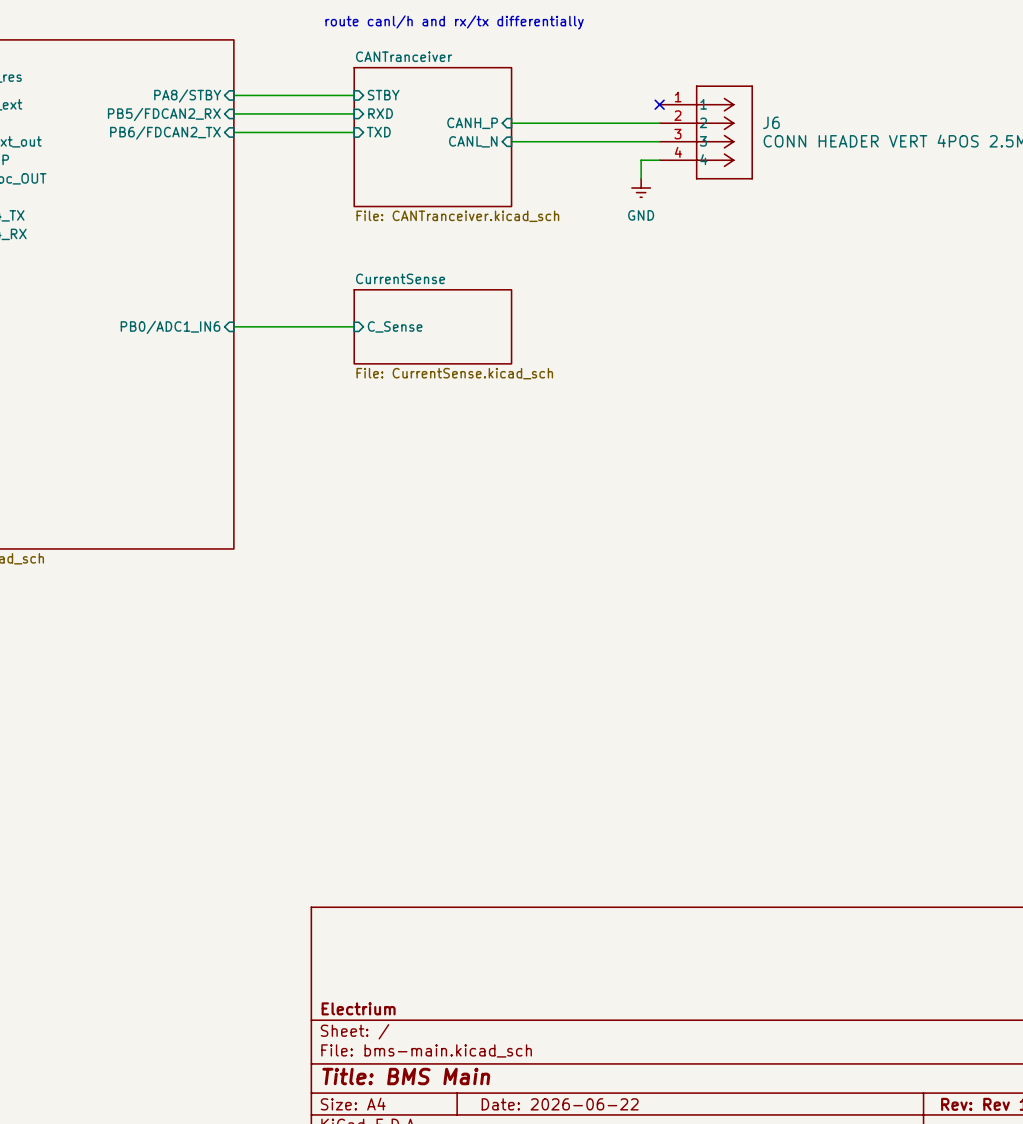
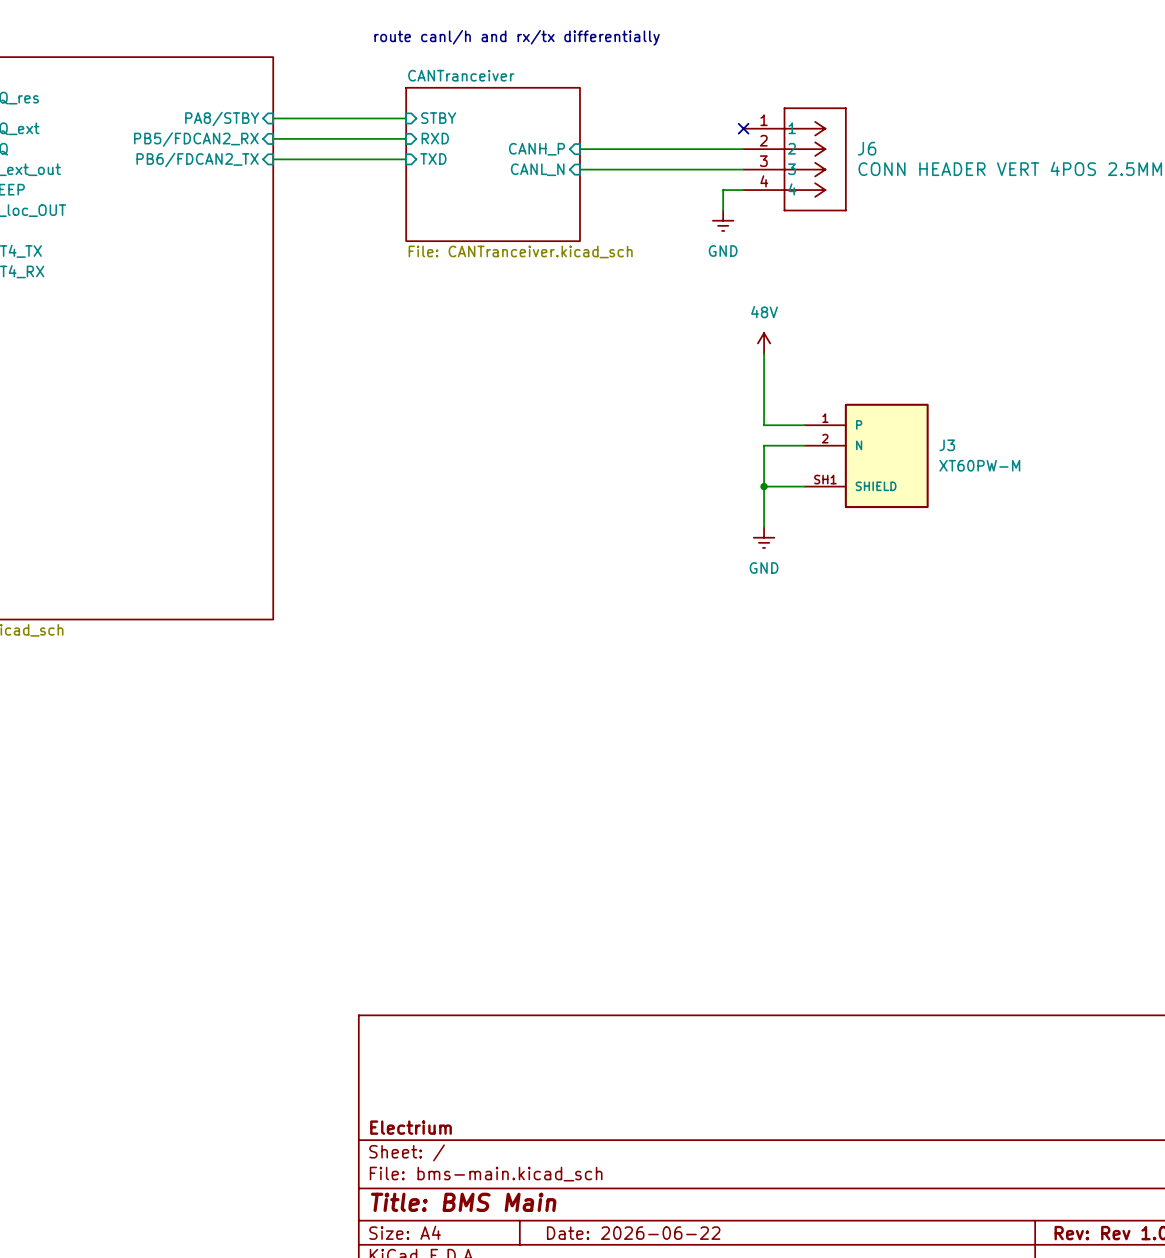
power symbol: none -> 48V (764, 343)
wire: none -> (764, 353) (764, 425) (804, 425)
wire: (233, 326) (354, 326) -> none
sheet pin: C_Sense (395, 326) -> none
sheet CurrentSense: File: CurrentSense.kicad_sch (432, 326) -> none
sheet pin: PB0/ADC1_IN6 (170, 327) -> none
wire: none -> (804, 445) (764, 445) (764, 527)
J3: none -> XT60PW-M (866, 455)
wire: none -> (764, 486) (804, 486)
junction: none -> (764, 486)
power symbol: none -> GND (764, 537)

